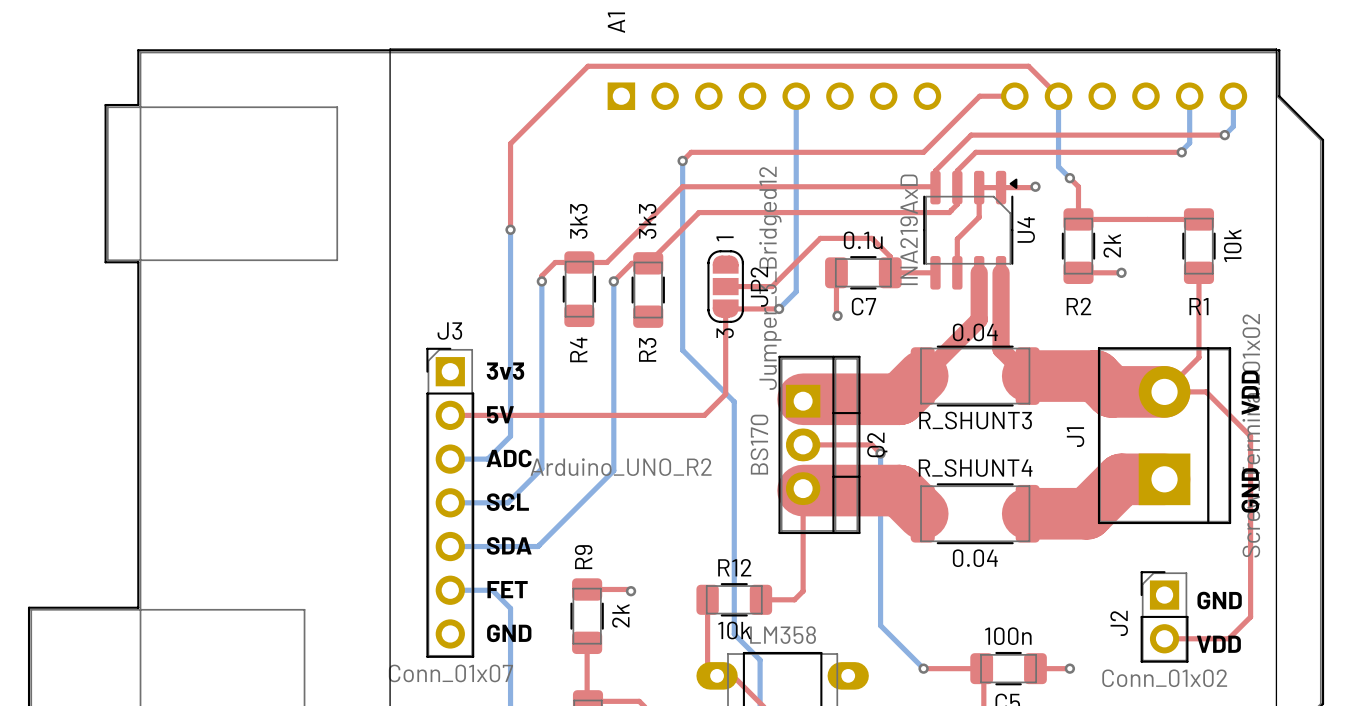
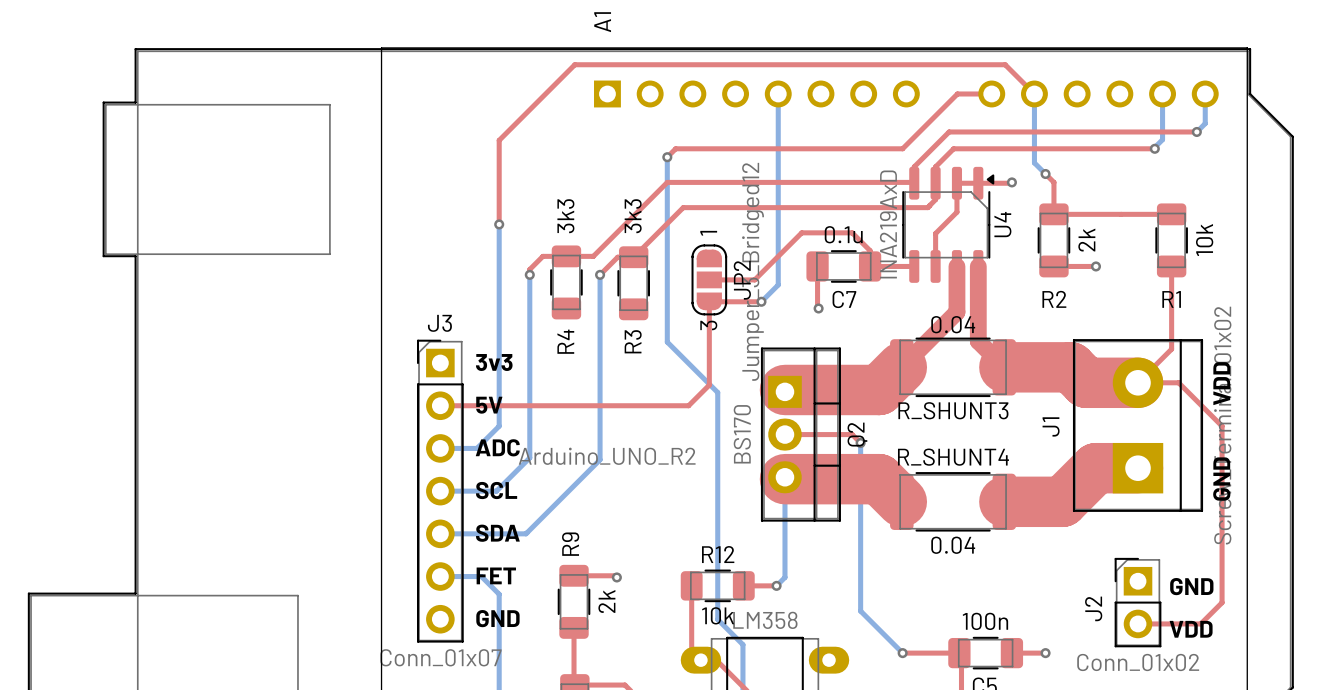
top track: (803, 488) (803, 591) (794, 599) -> none
bottom track: none -> (784, 477) (784, 577) (776, 585)
via: none -> (776, 585)

